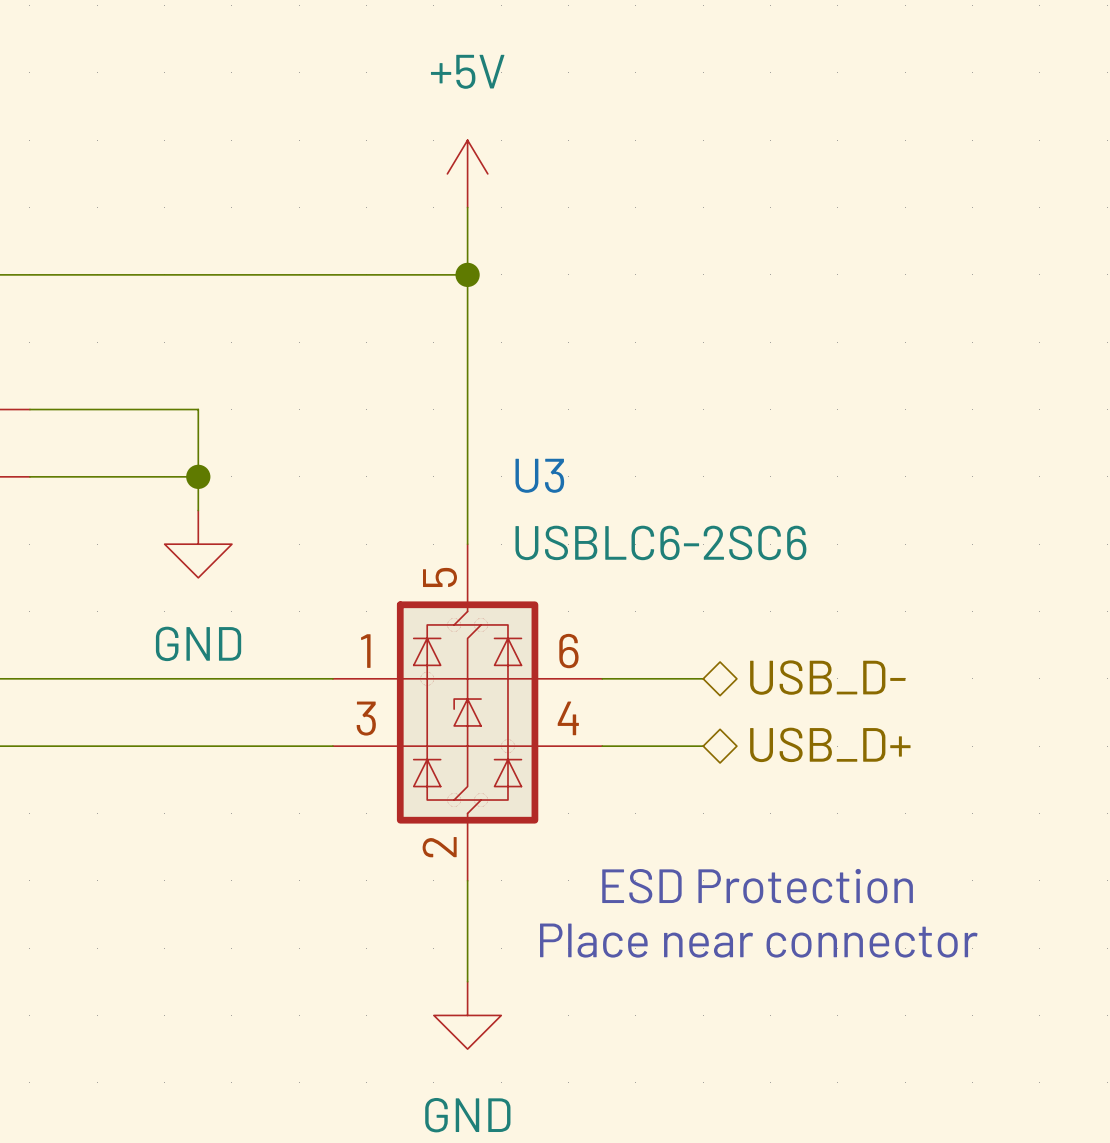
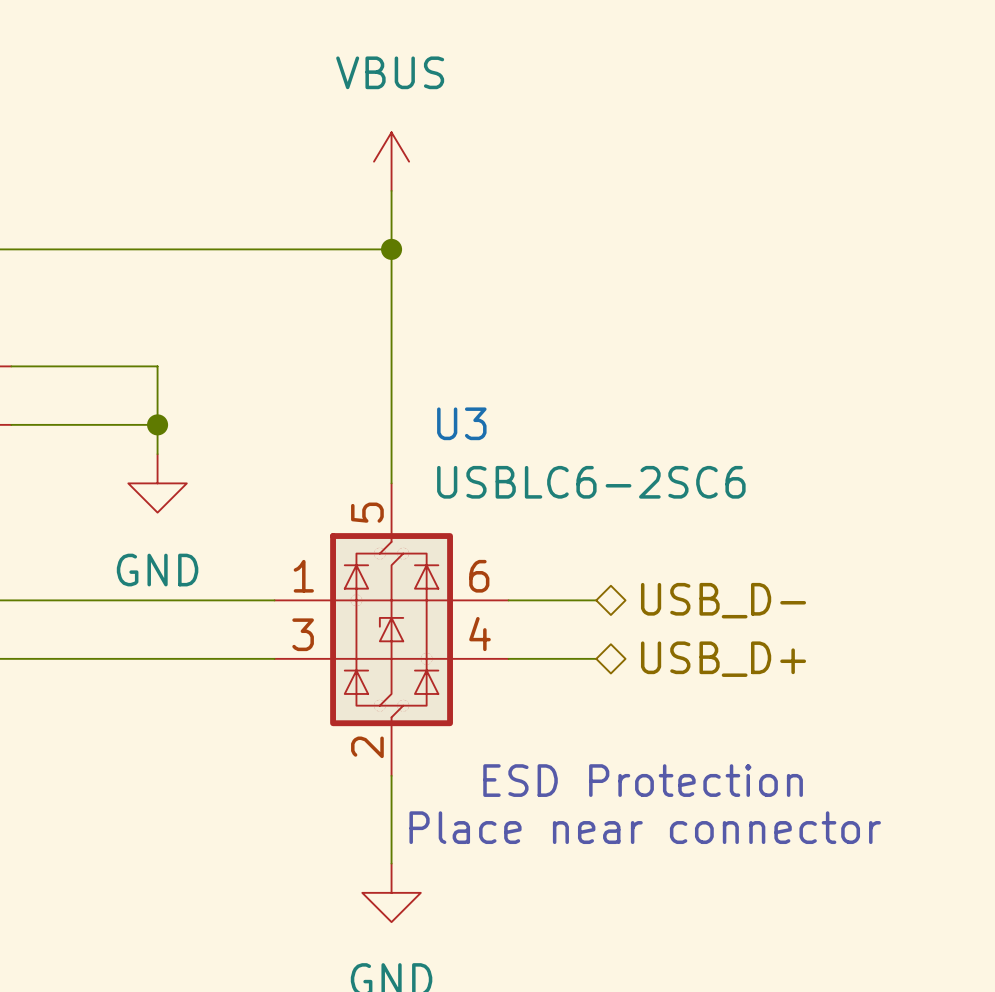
power symbol: +5V (467, 173) -> VBUS (391, 161)

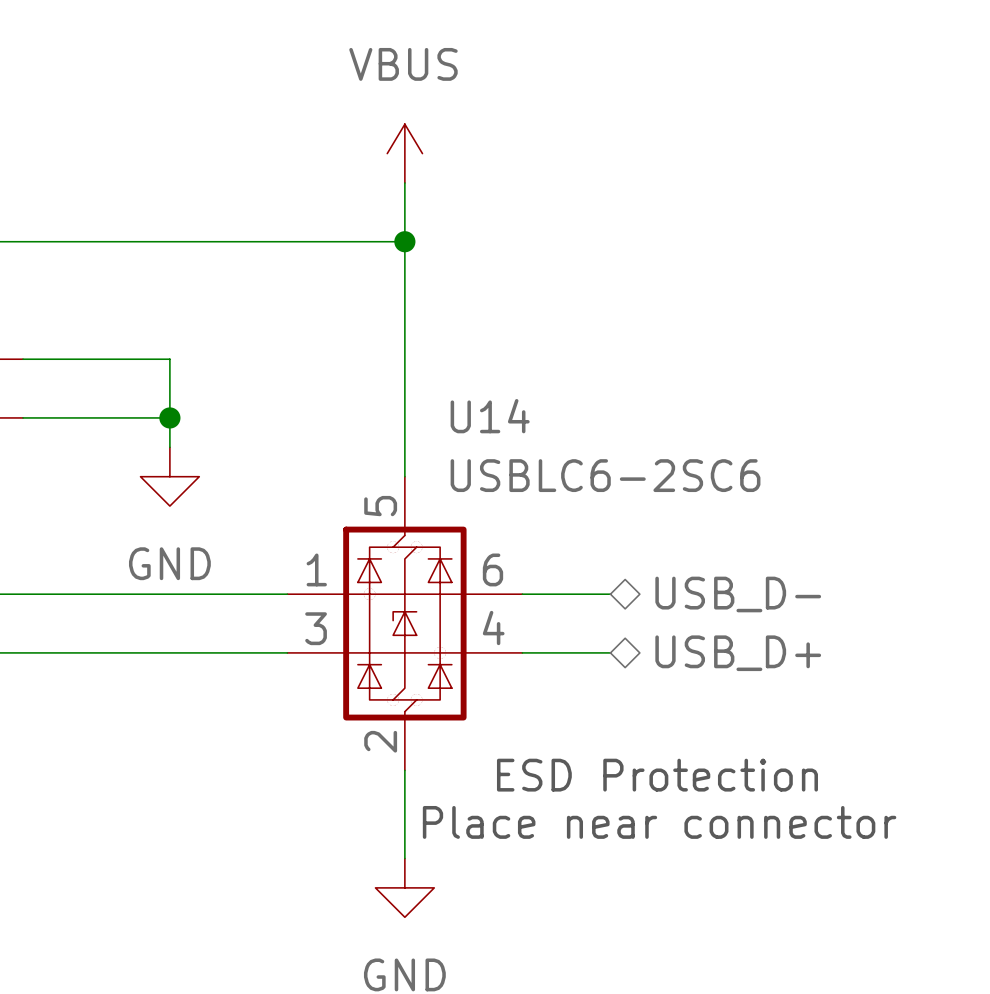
U3 name: U3 (461, 423) -> U14 (490, 416)

